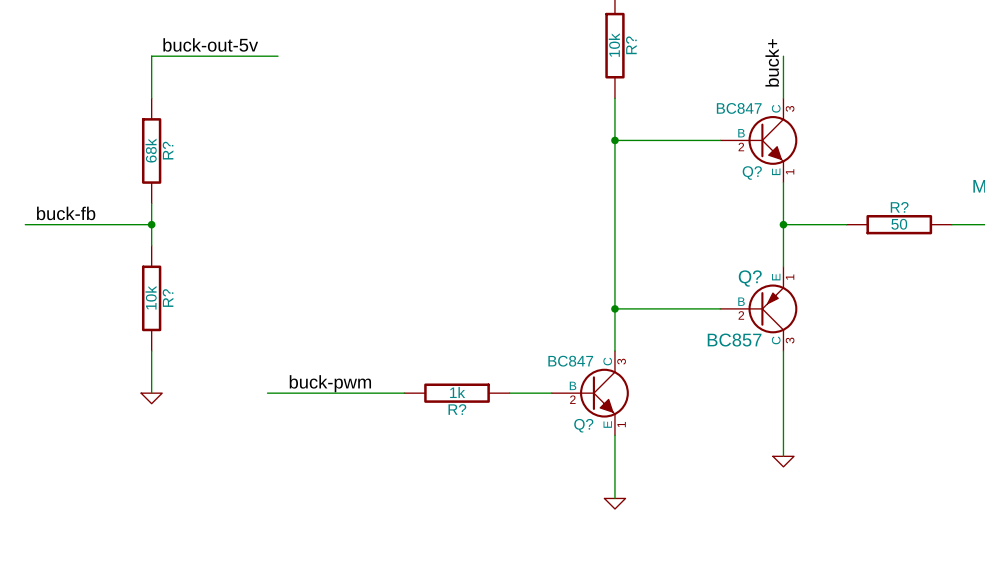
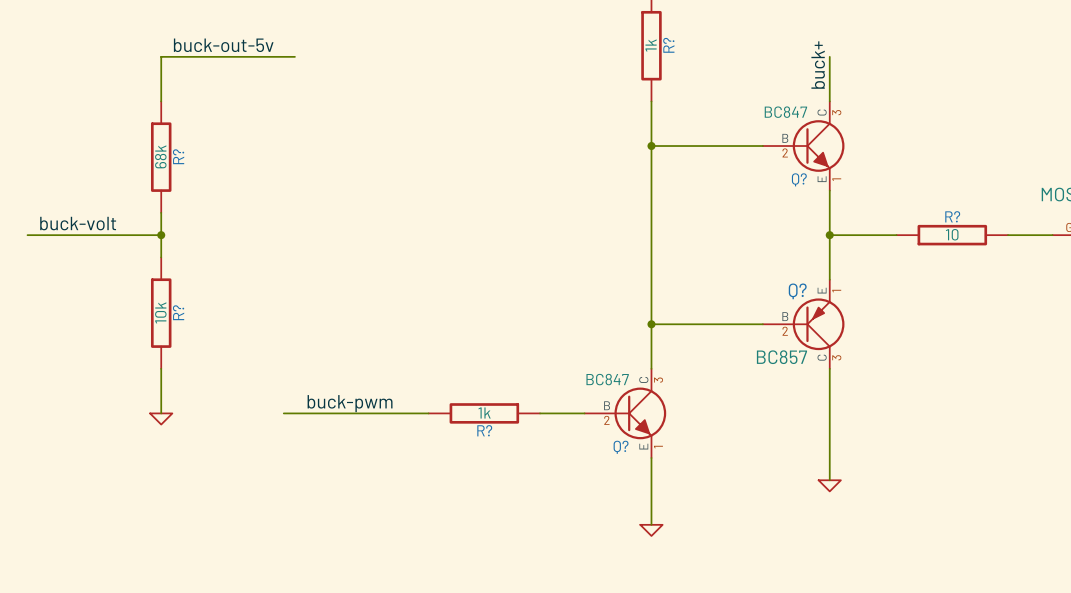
R? value: 10k (614, 45) -> 1k (651, 45)
label: buck-fb (66, 213) -> buck-volt (78, 223)
R? value: 50 (899, 224) -> 10 (952, 234)

